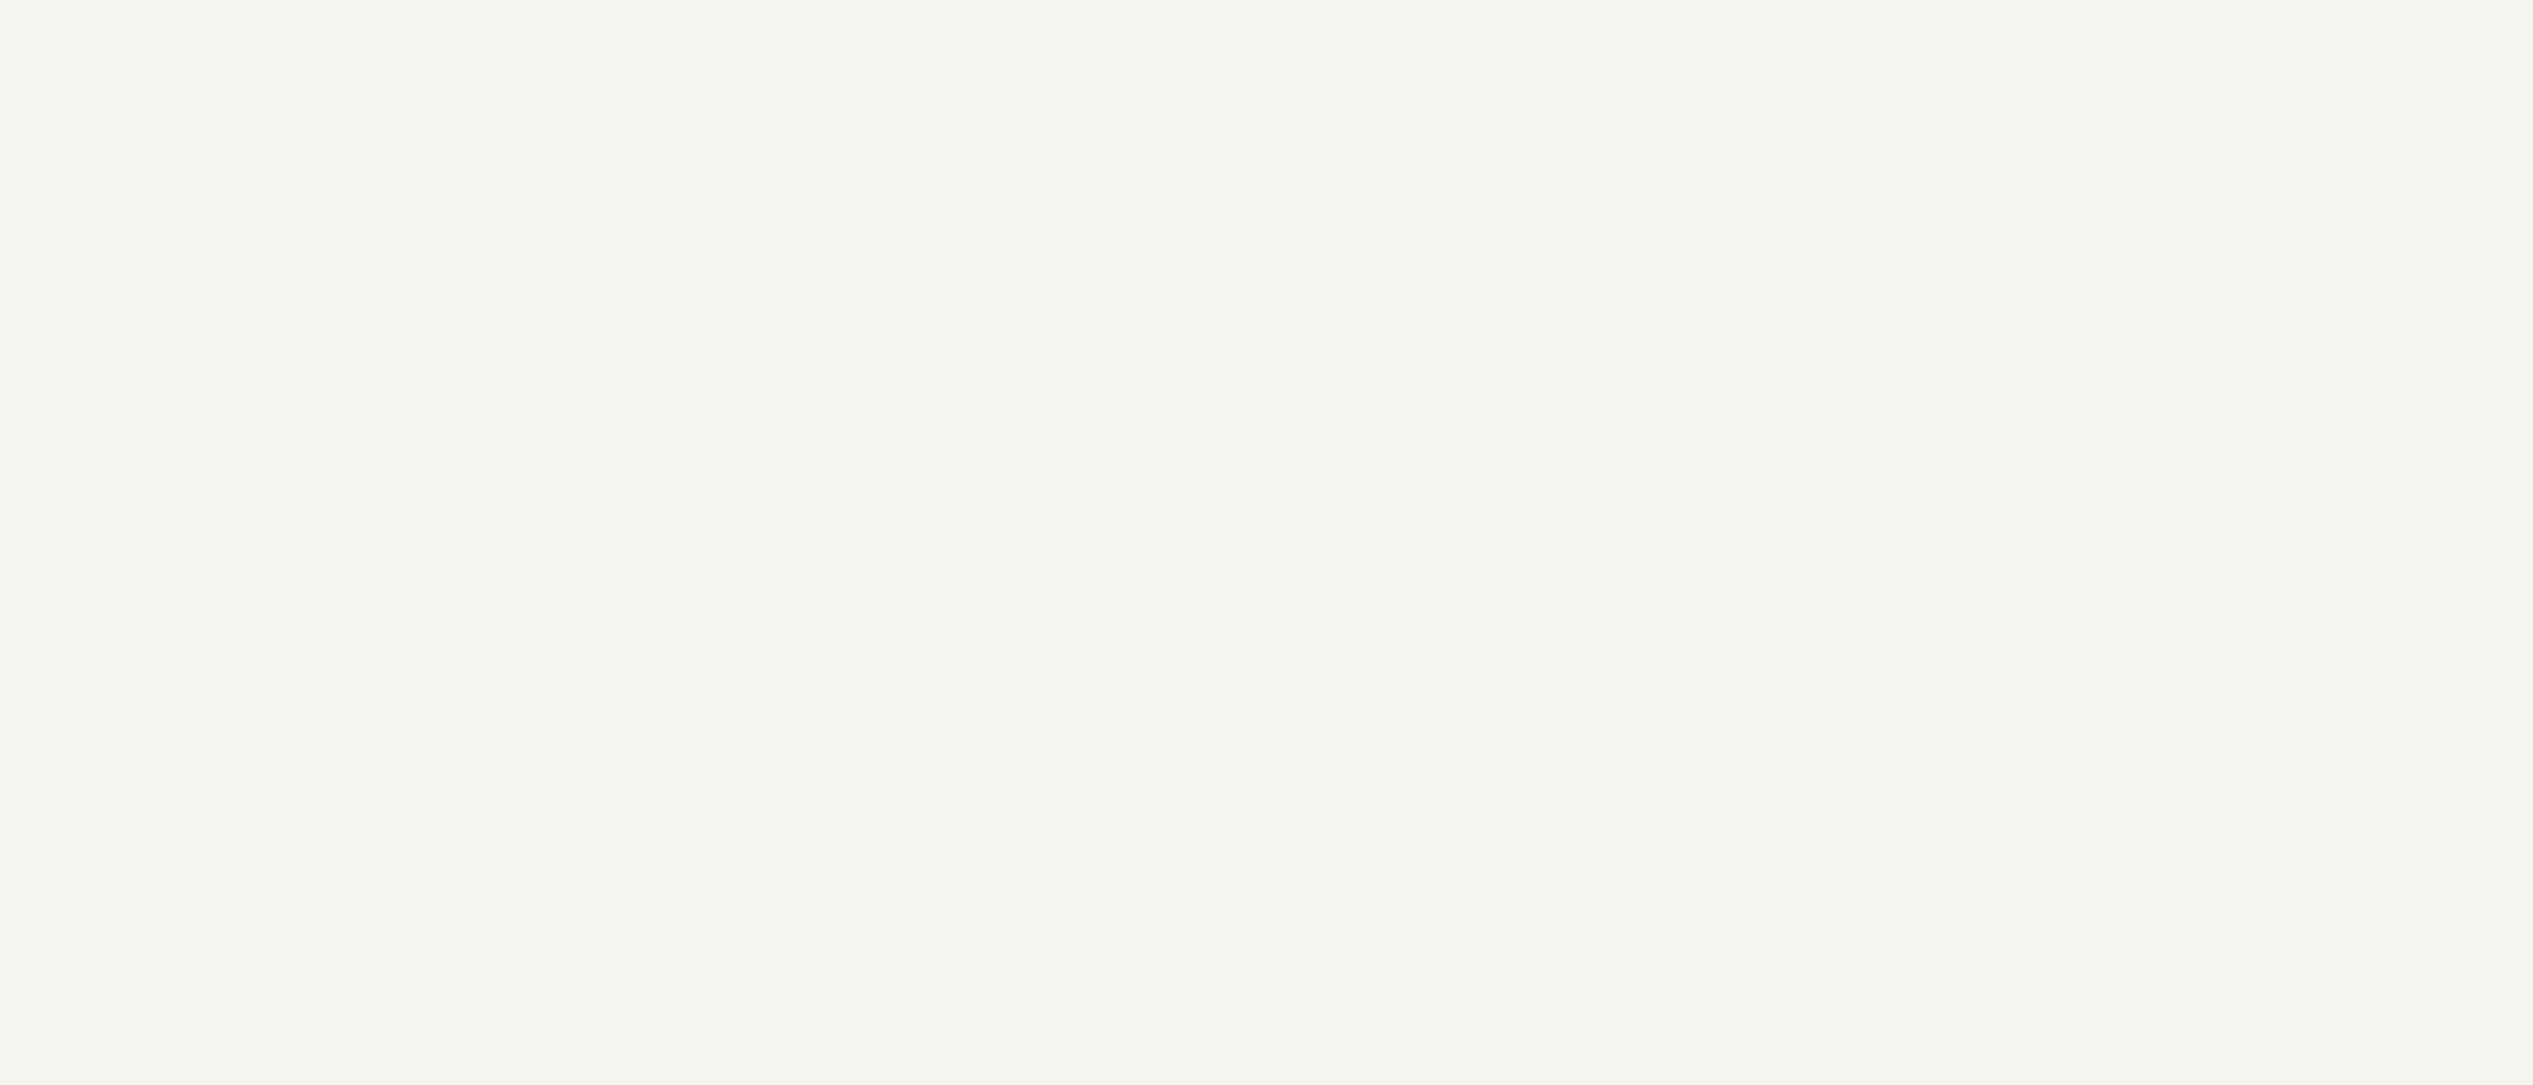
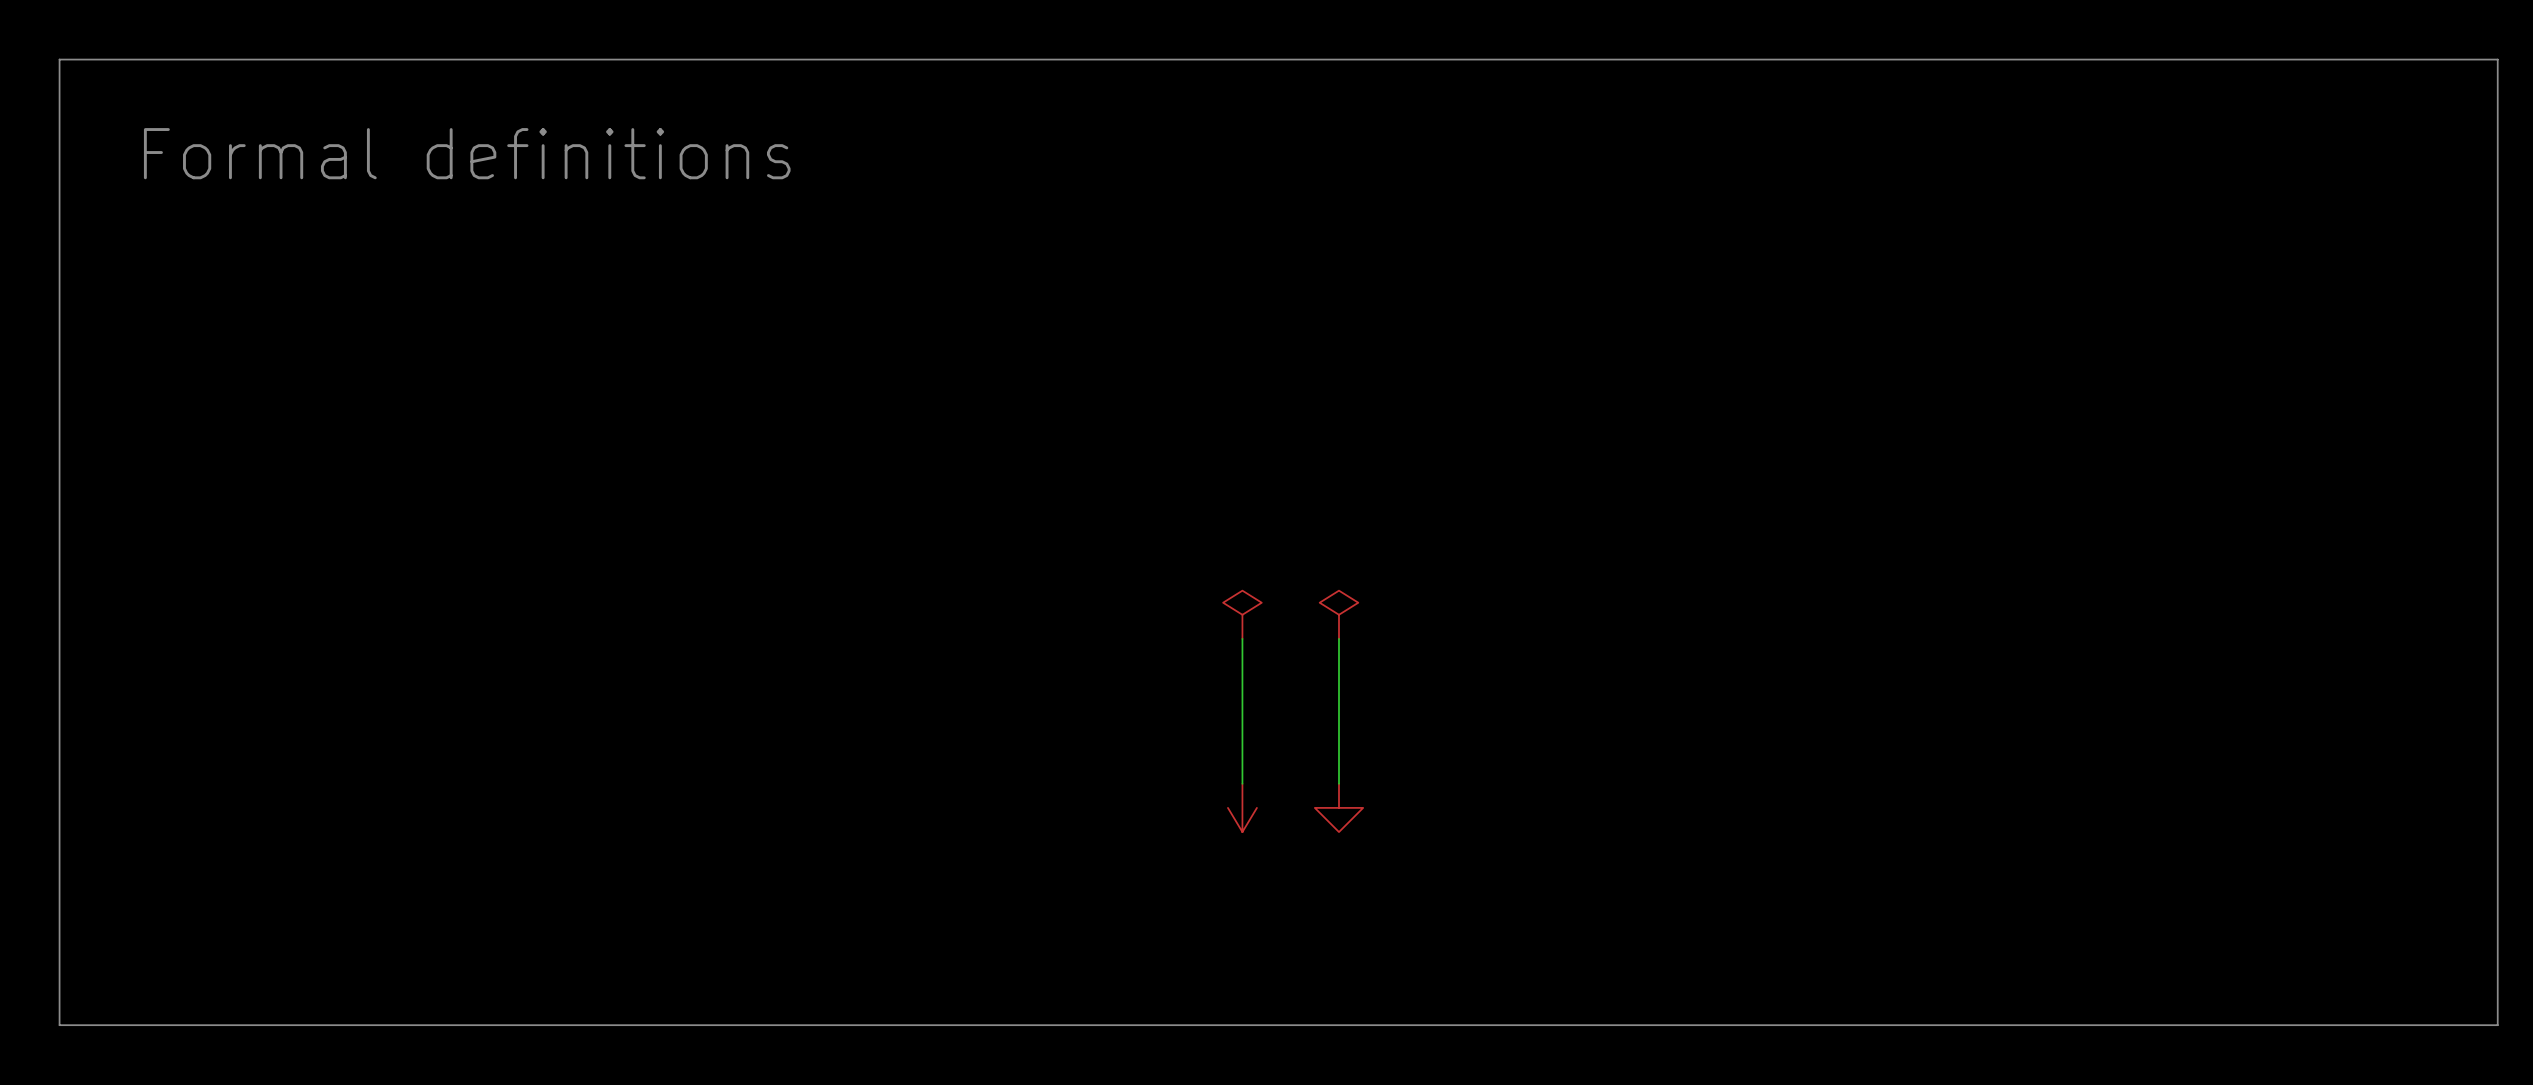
line: none -> (59, 59) (2497, 59) (2497, 1025) (59, 1025) (59, 59)
text: none -> Formal definitions (467, 153)
power symbol: none -> (1242, 614)
power symbol: none -> (1339, 614)
wire: none -> (1242, 638) (1242, 783)
wire: none -> (1339, 638) (1339, 783)
power symbol: none -> (1242, 807)
power symbol: none -> (1339, 807)

